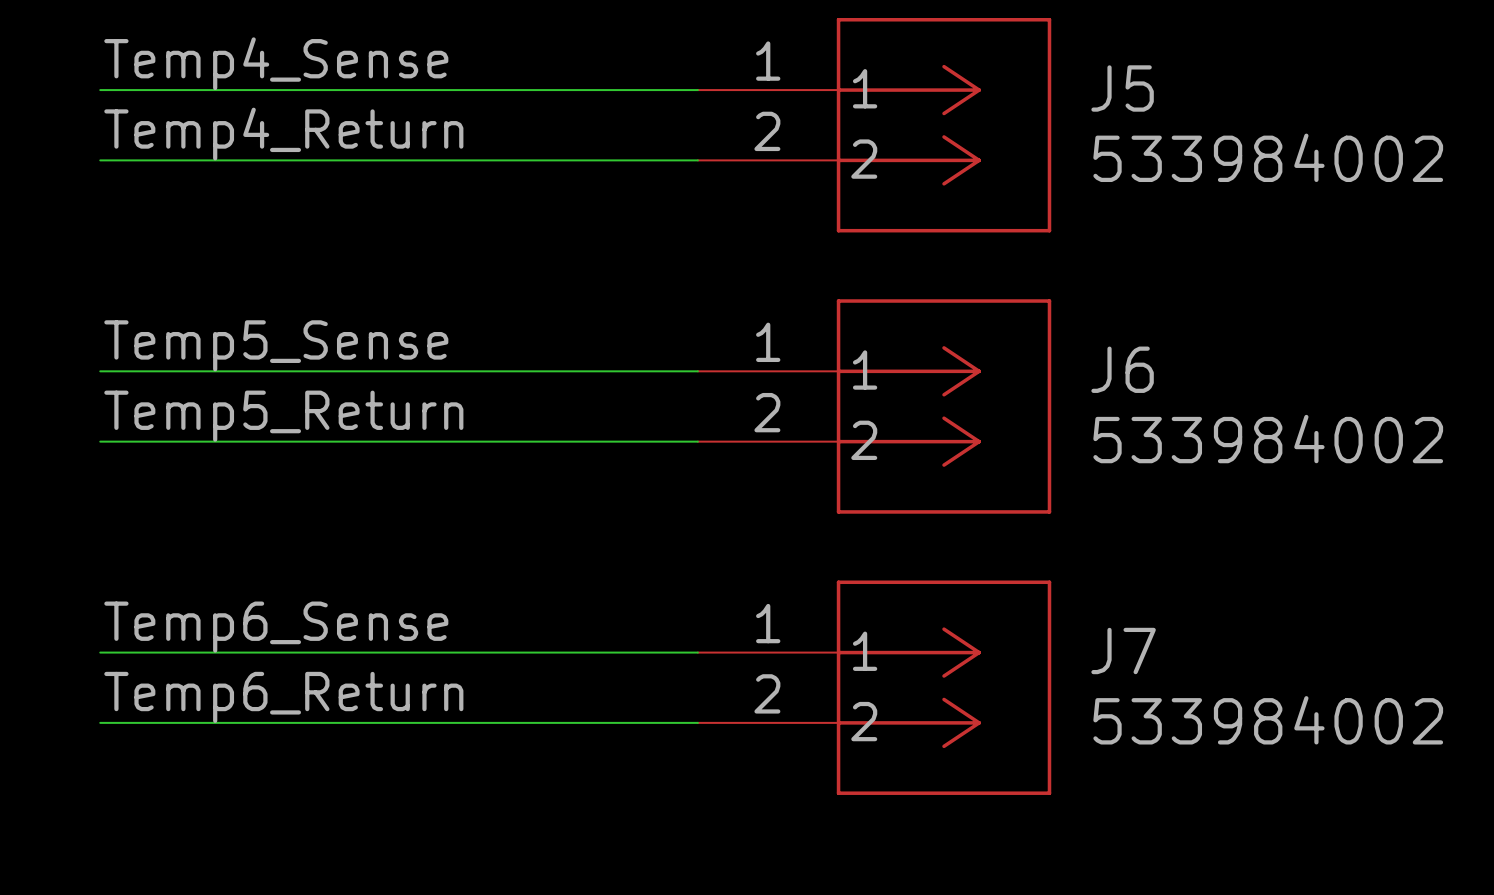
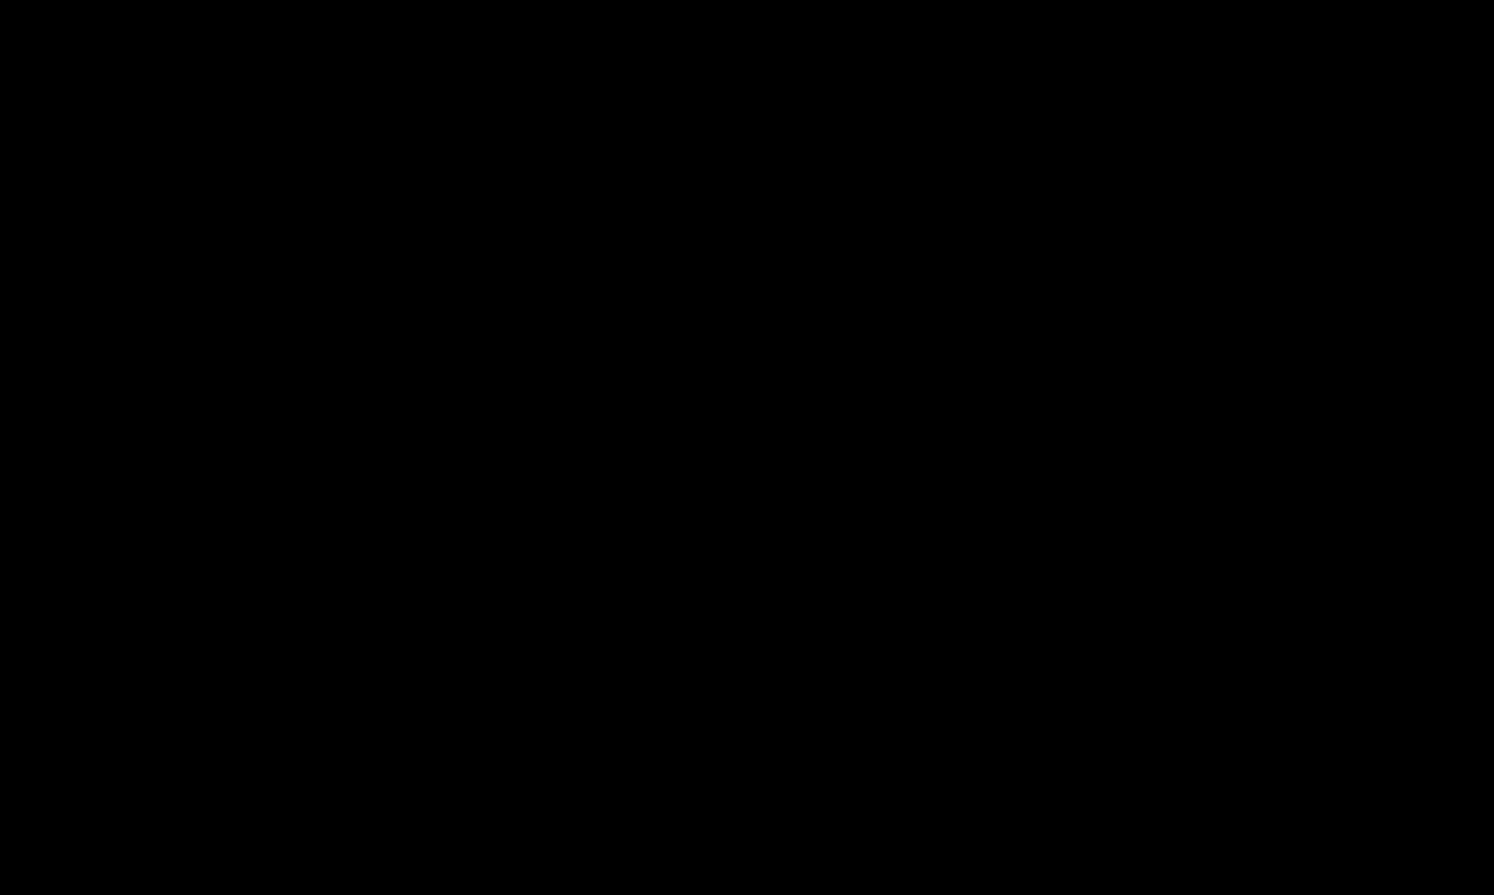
label: Temp4_Sense (276, 63) -> none
wire: (100, 90) (697, 90) -> none
J5: 533984002 (874, 125) -> none
label: Temp4_Return (283, 134) -> none
wire: (100, 160) (697, 160) -> none
label: Temp5_Sense (276, 345) -> none
wire: (100, 371) (697, 371) -> none
J6: 533984002 (874, 406) -> none
label: Temp5_Return (283, 416) -> none
wire: (100, 441) (697, 441) -> none
label: Temp6_Sense (276, 627) -> none
wire: (100, 652) (697, 652) -> none
J7: 533984002 (874, 687) -> none
label: Temp6_Return (283, 697) -> none
wire: (100, 722) (697, 722) -> none

